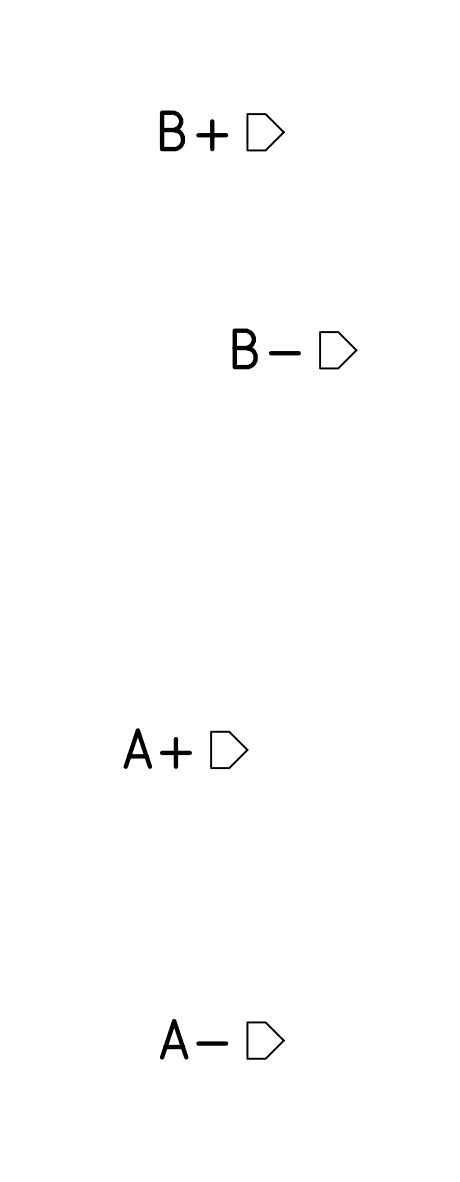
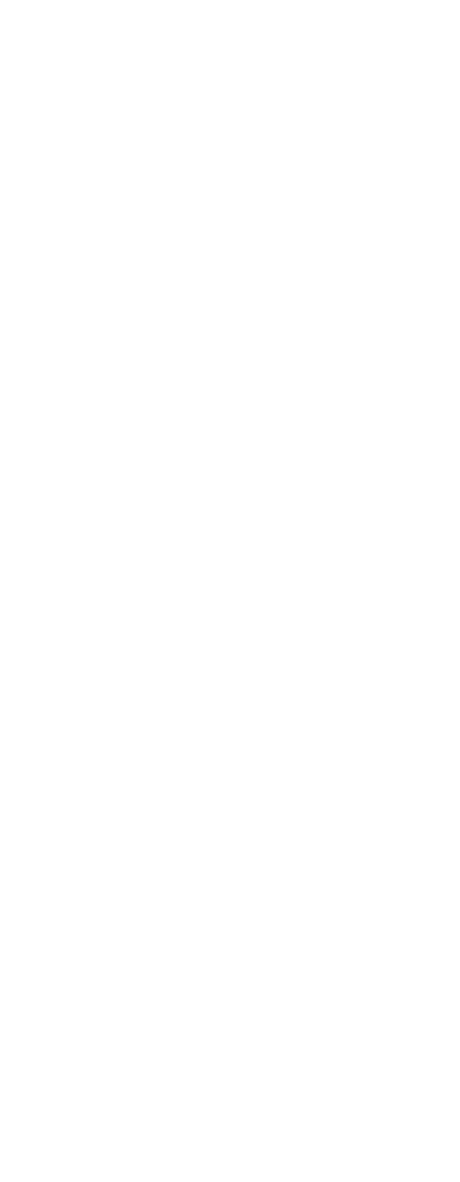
hierarchical label: B+ (194, 130) -> none
hierarchical label: B- (266, 348) -> none
hierarchical label: A+ (157, 748) -> none
hierarchical label: A- (194, 1039) -> none

